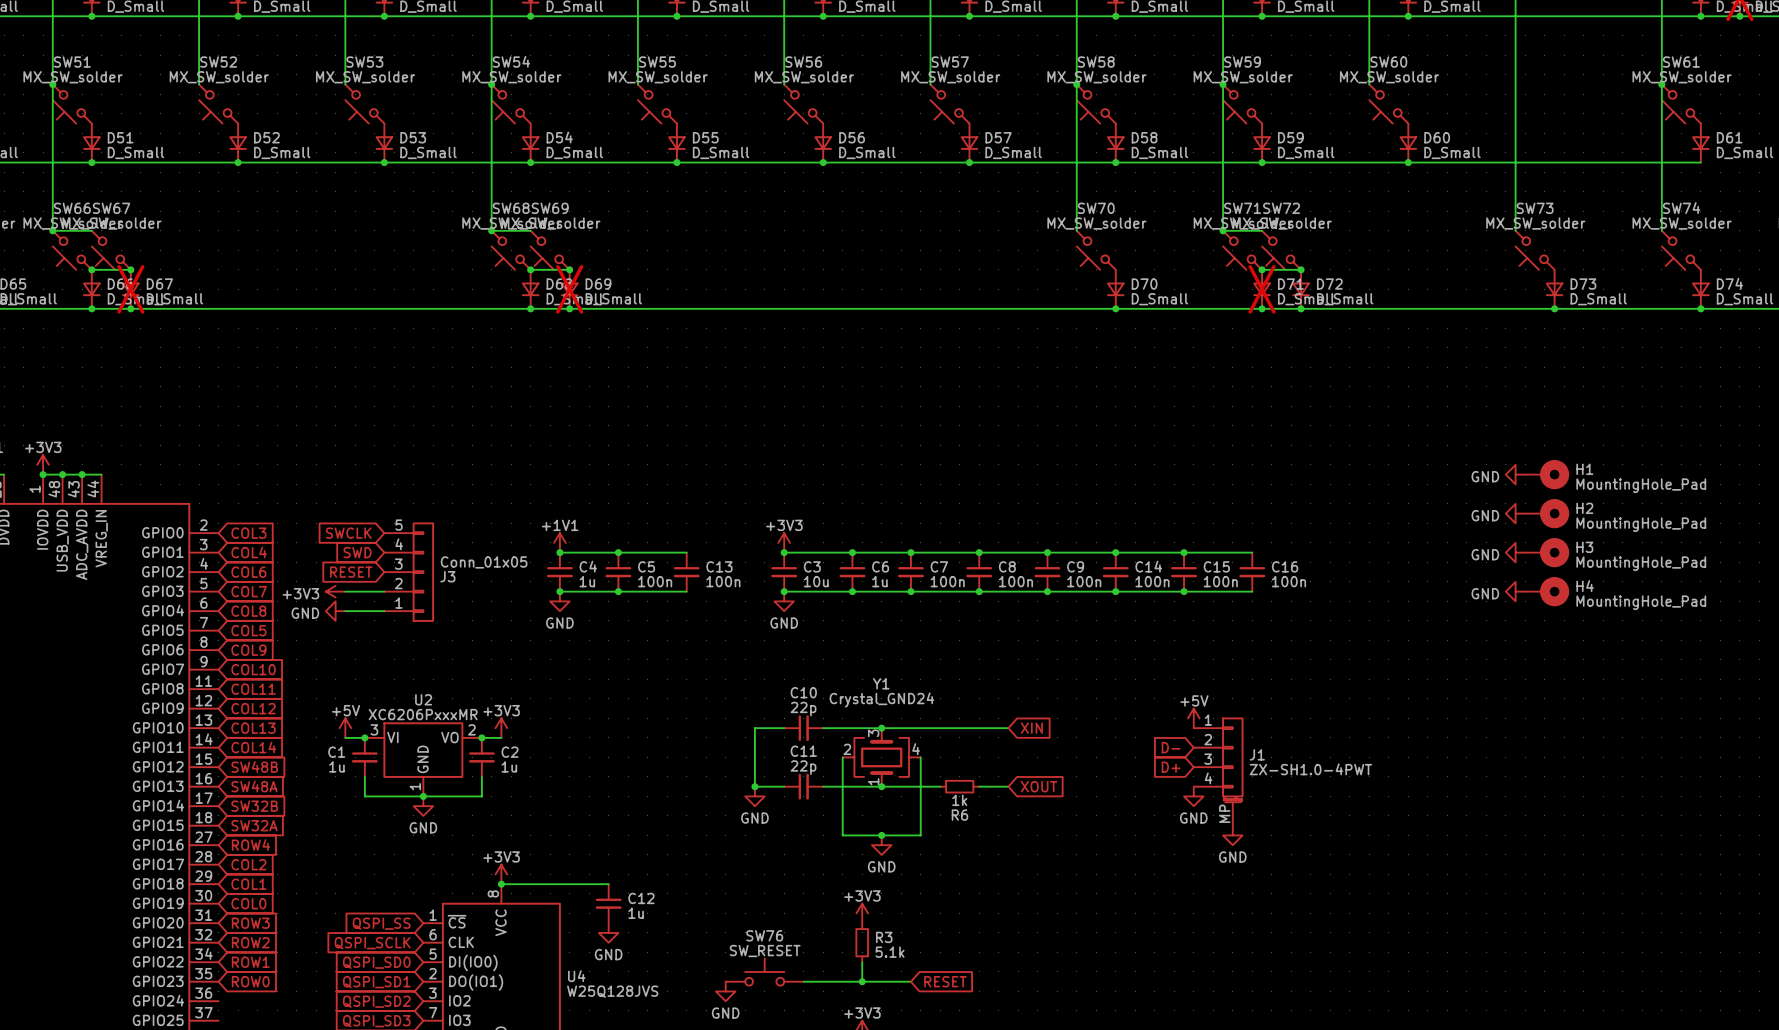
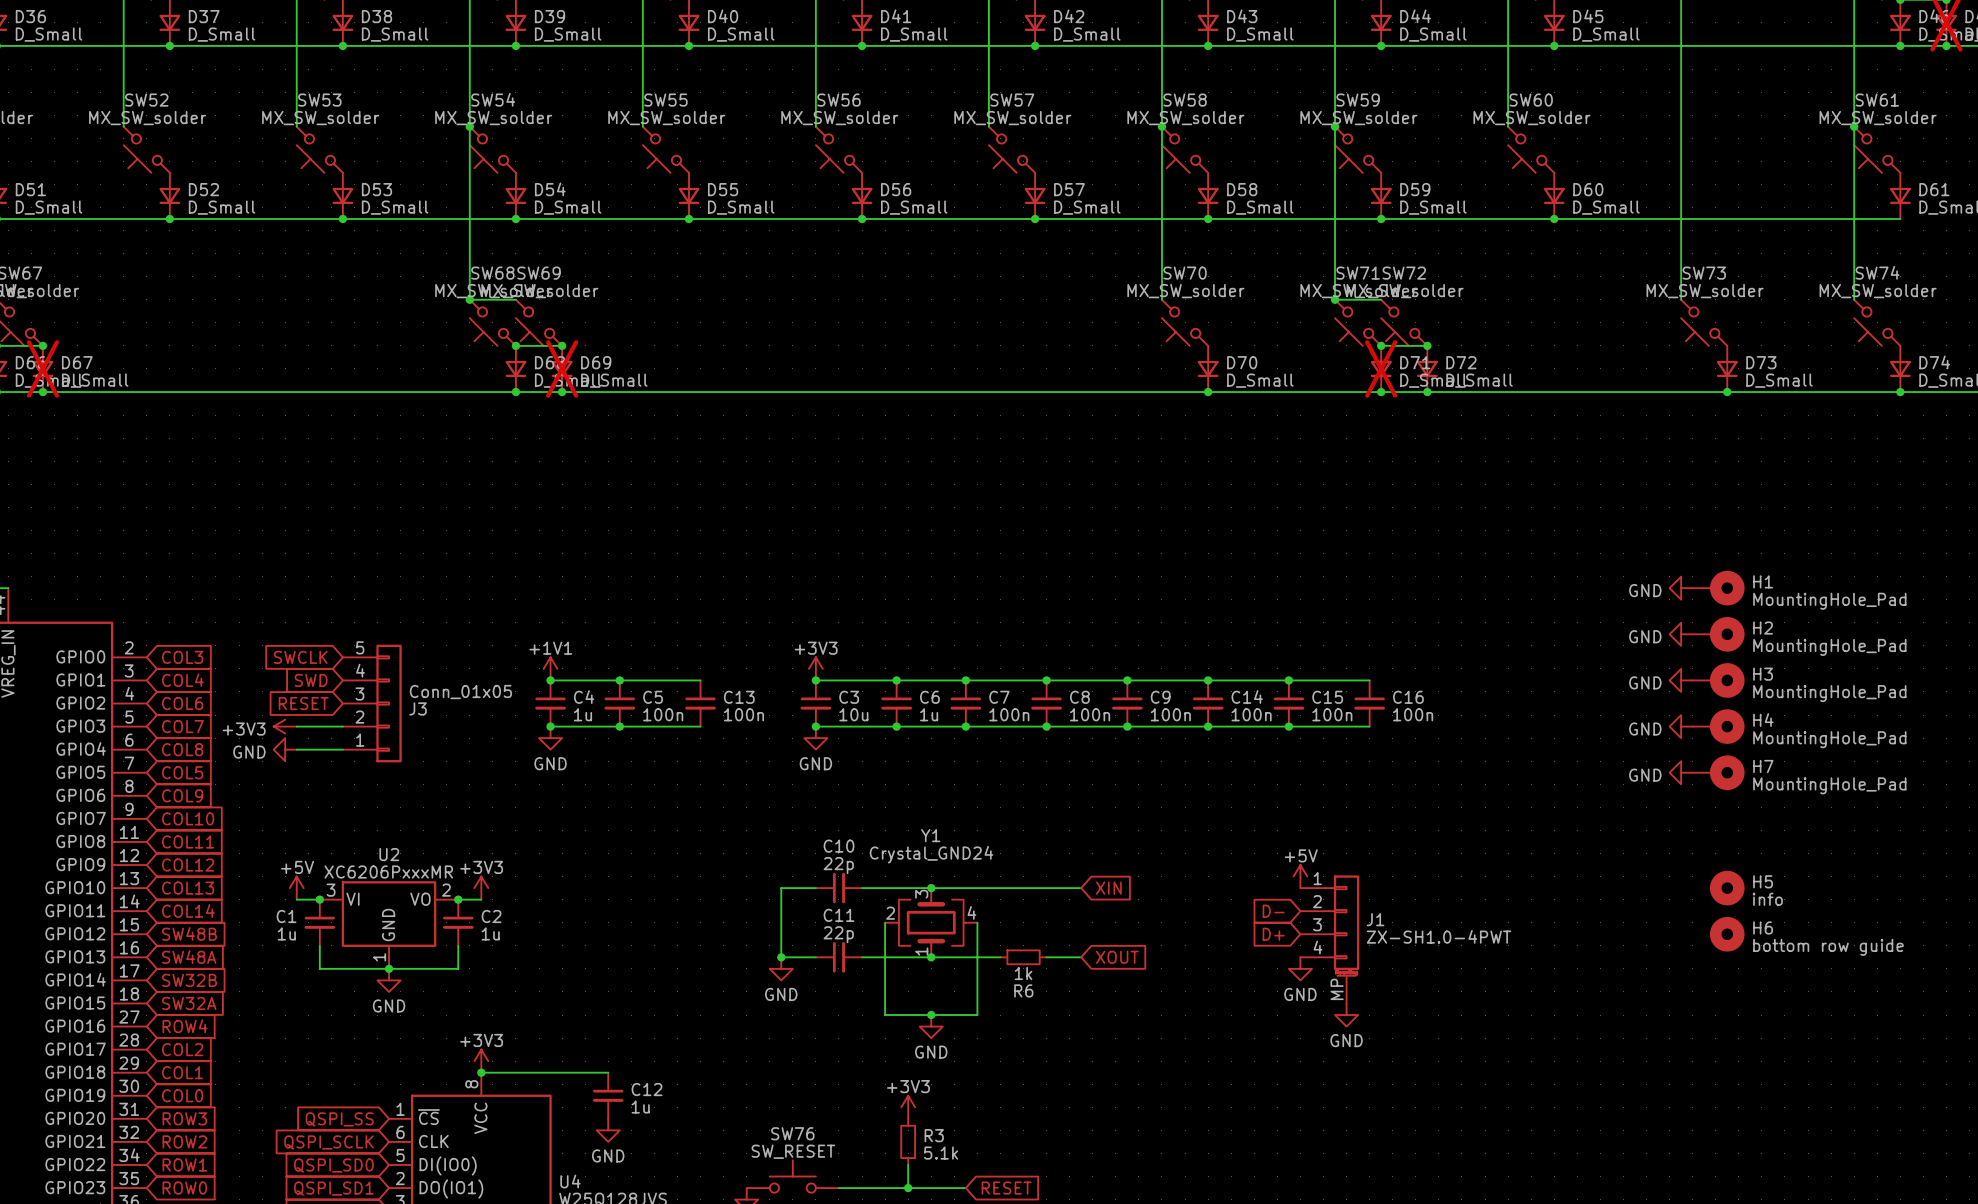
power symbol: none -> GND (1681, 772)
H7: none -> MountingHole_Pad (1718, 772)
H5: none -> info (1727, 888)
H6: none -> bottom row guide (1727, 934)

